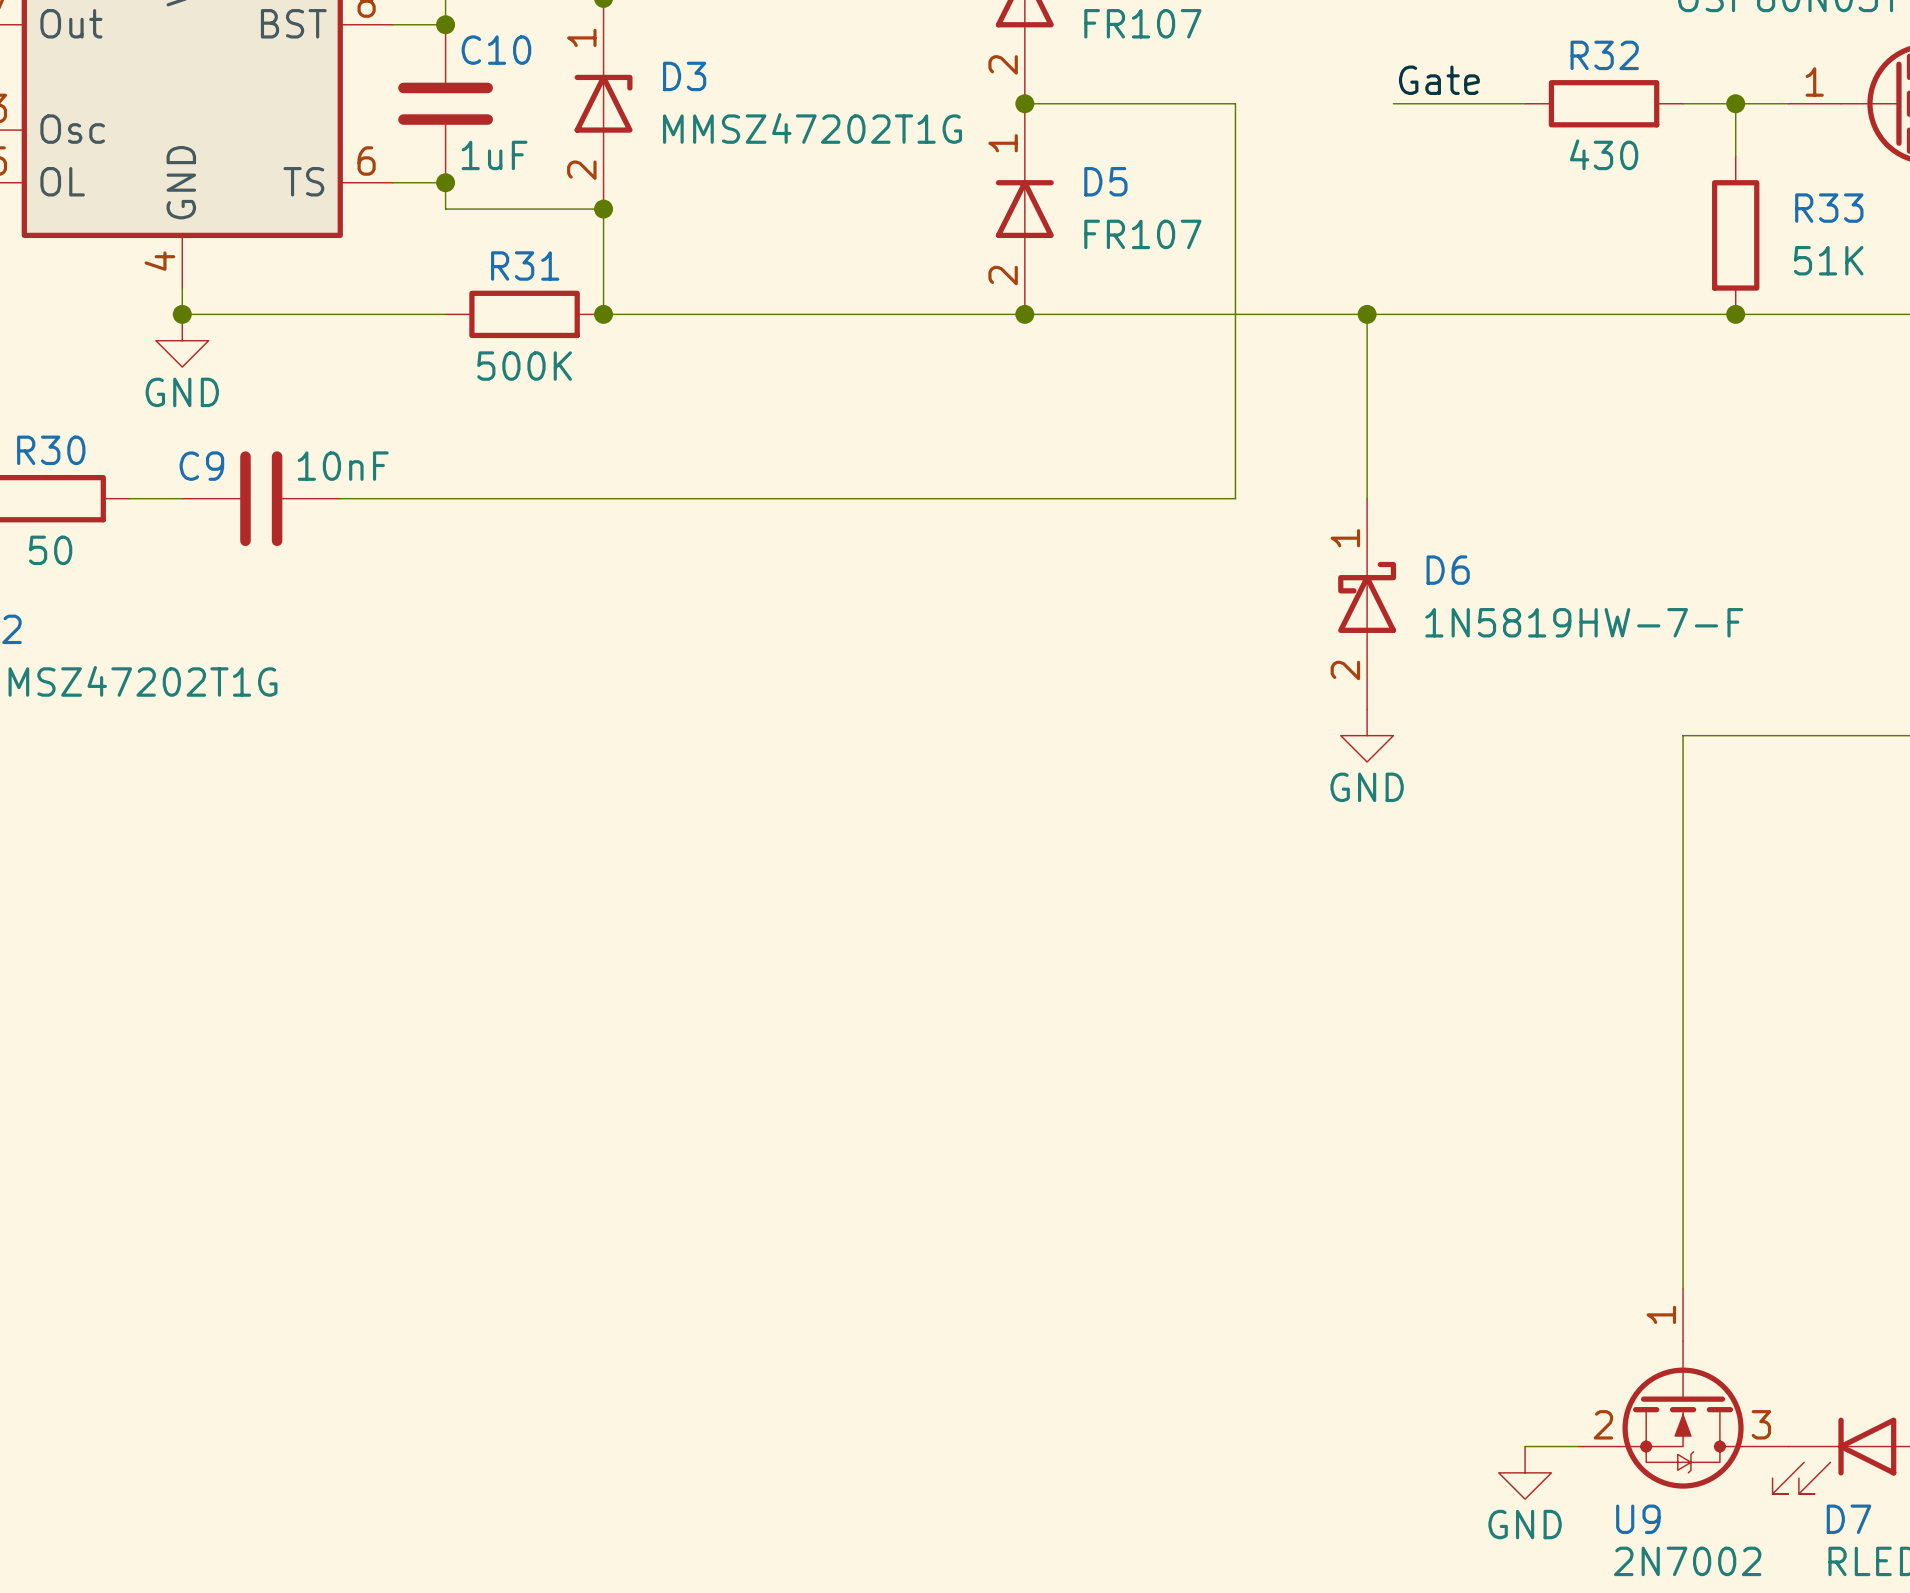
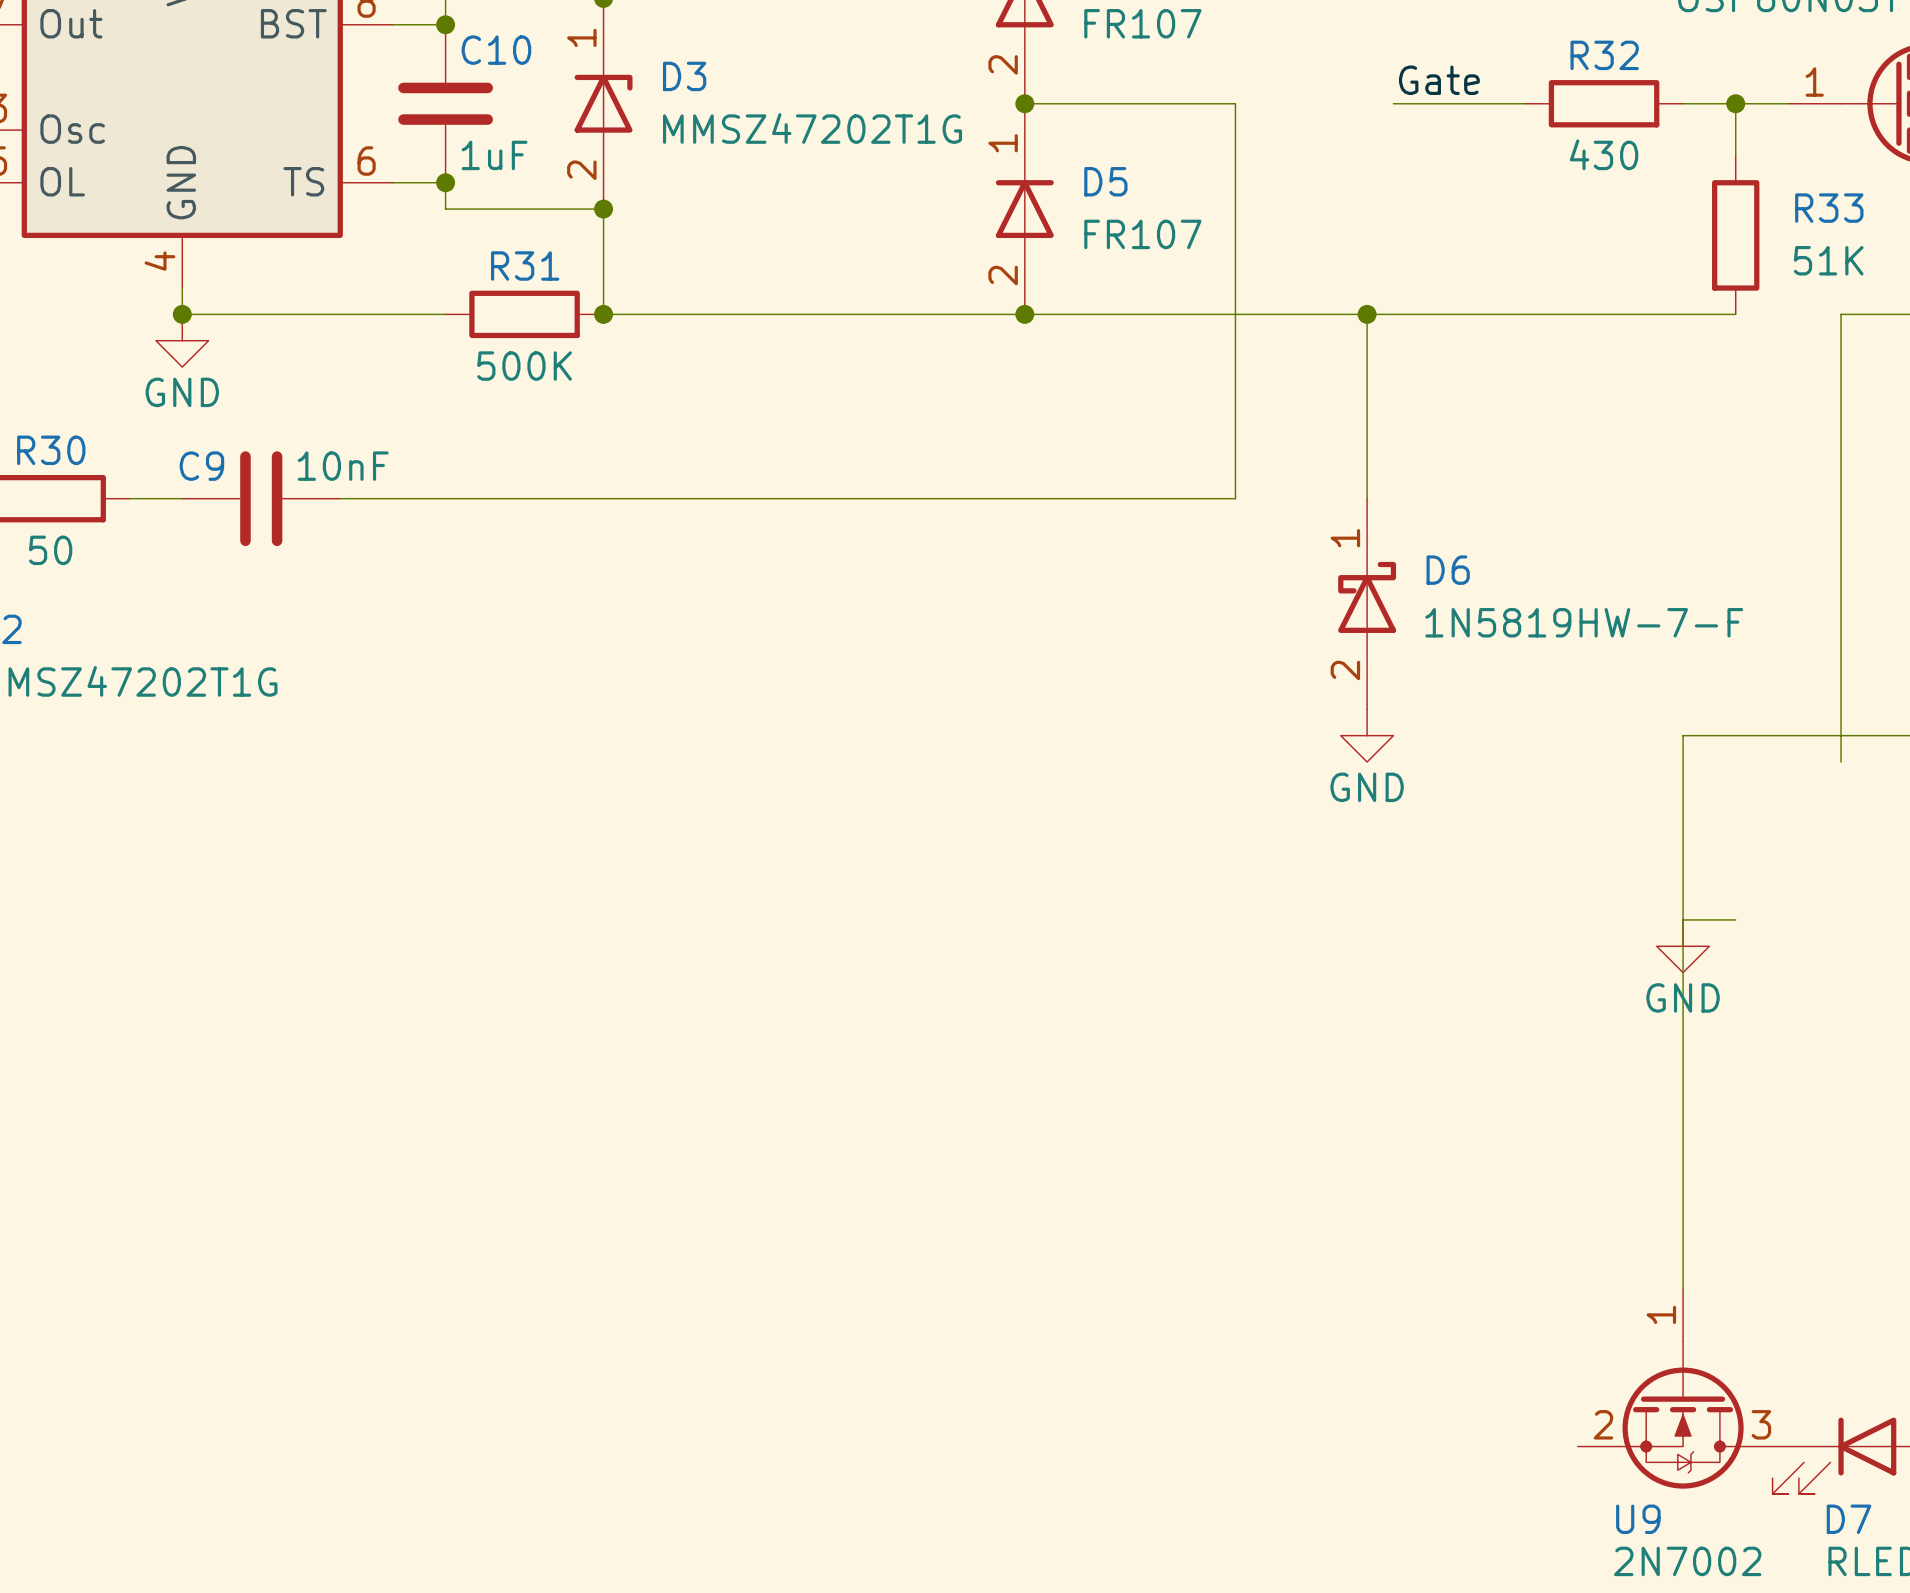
wire: (1735, 314) (1841, 314) -> (1841, 761) (1841, 314)
junction: (1735, 314) -> none
wire: none -> (1683, 919) (1735, 919)
power symbol: none -> GND (1683, 946)
wire: (1525, 1446) (1577, 1446) -> none
power symbol: GND (1525, 1472) -> none

